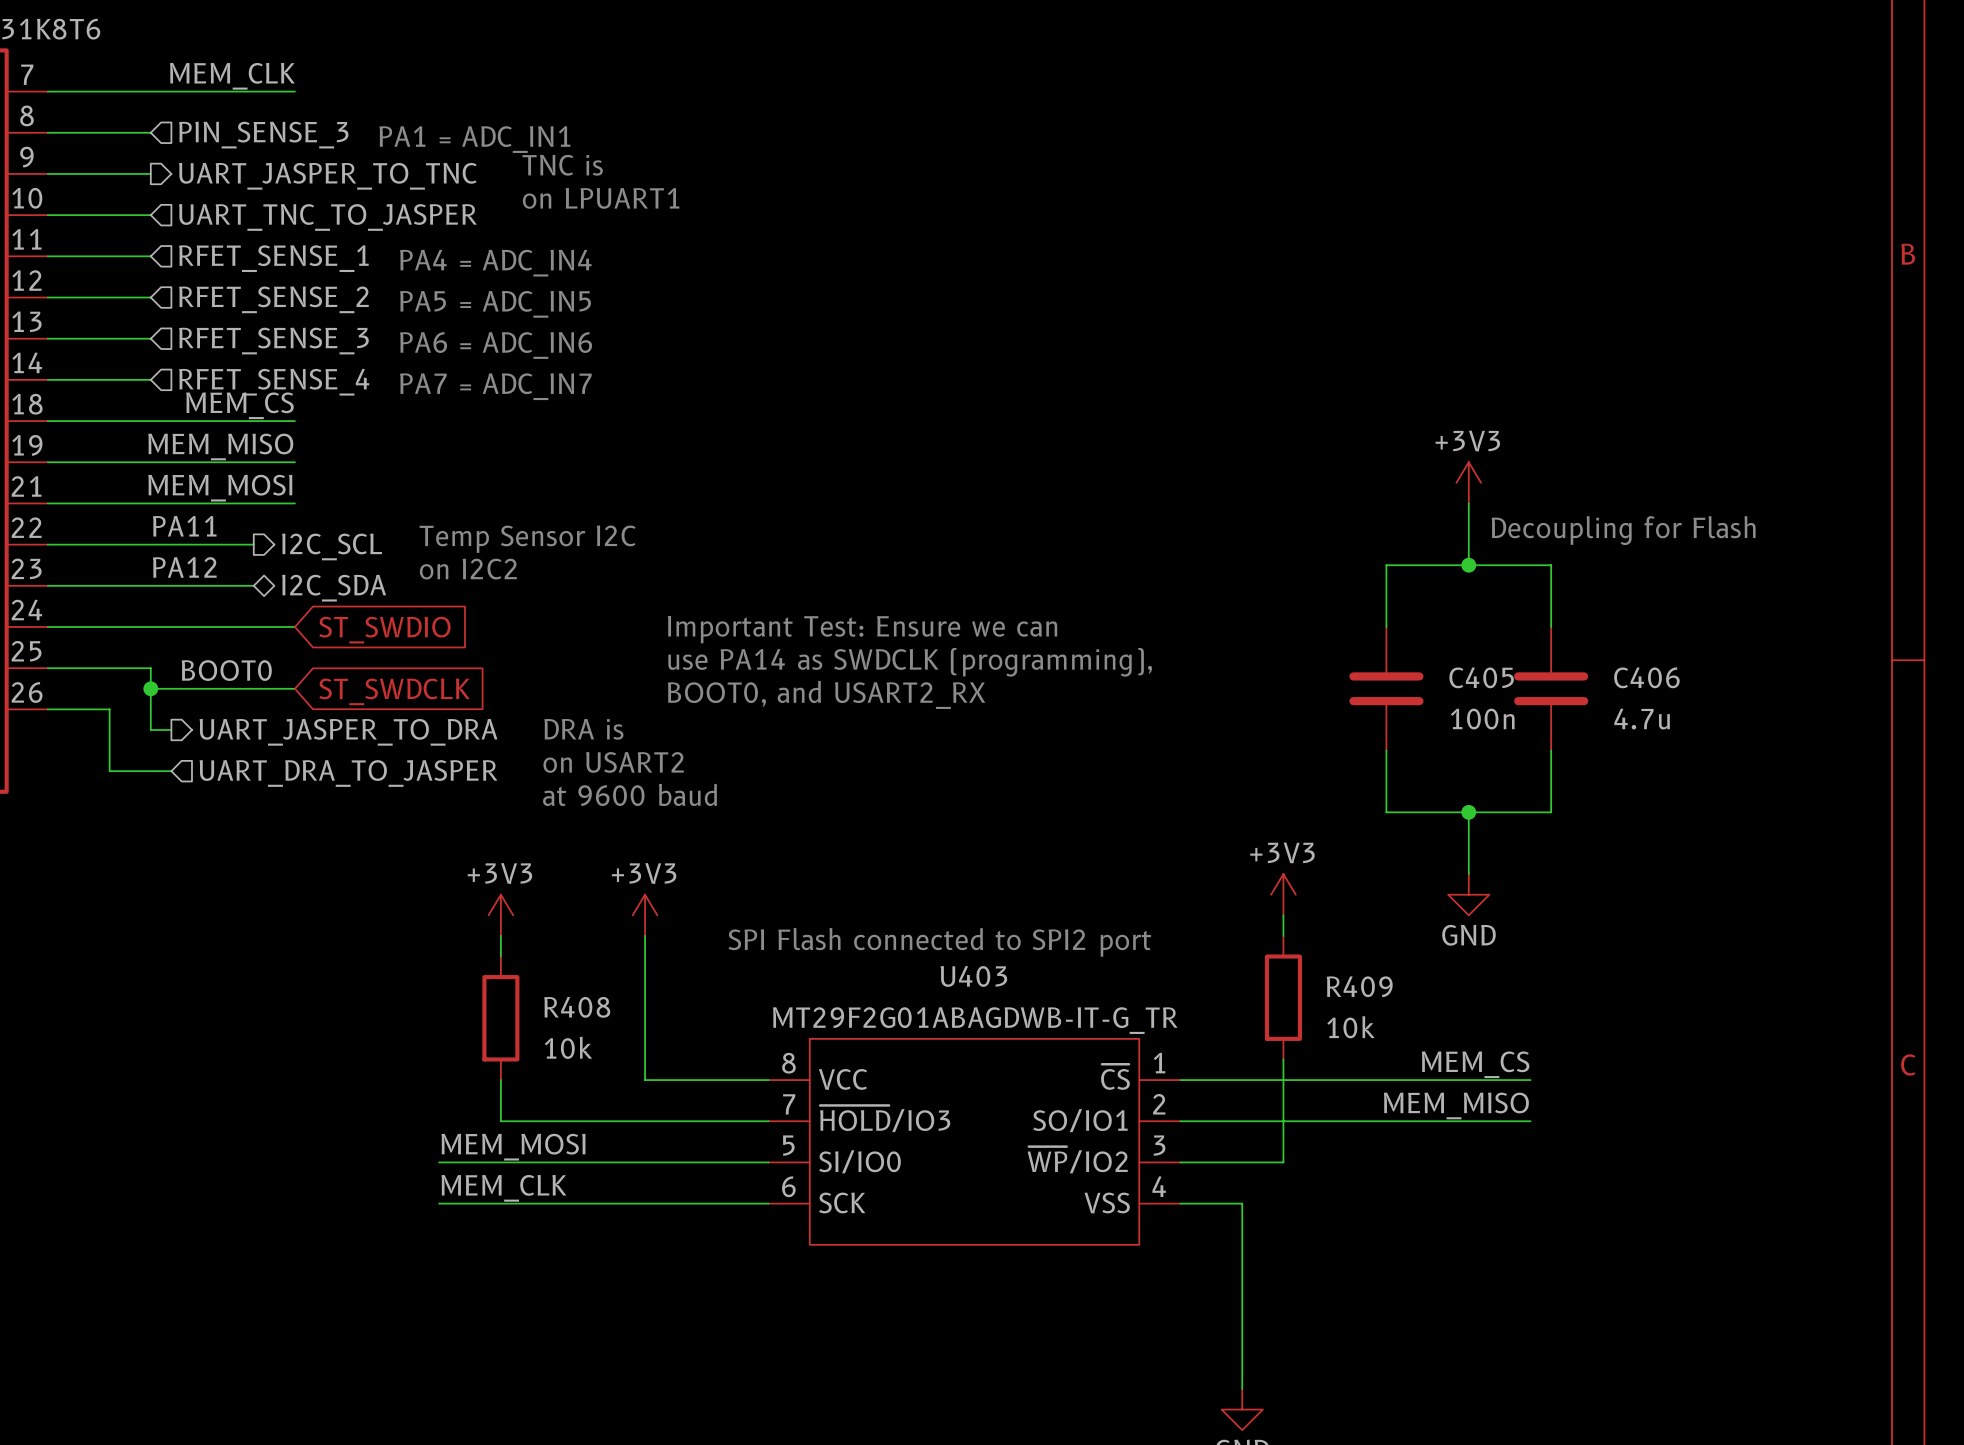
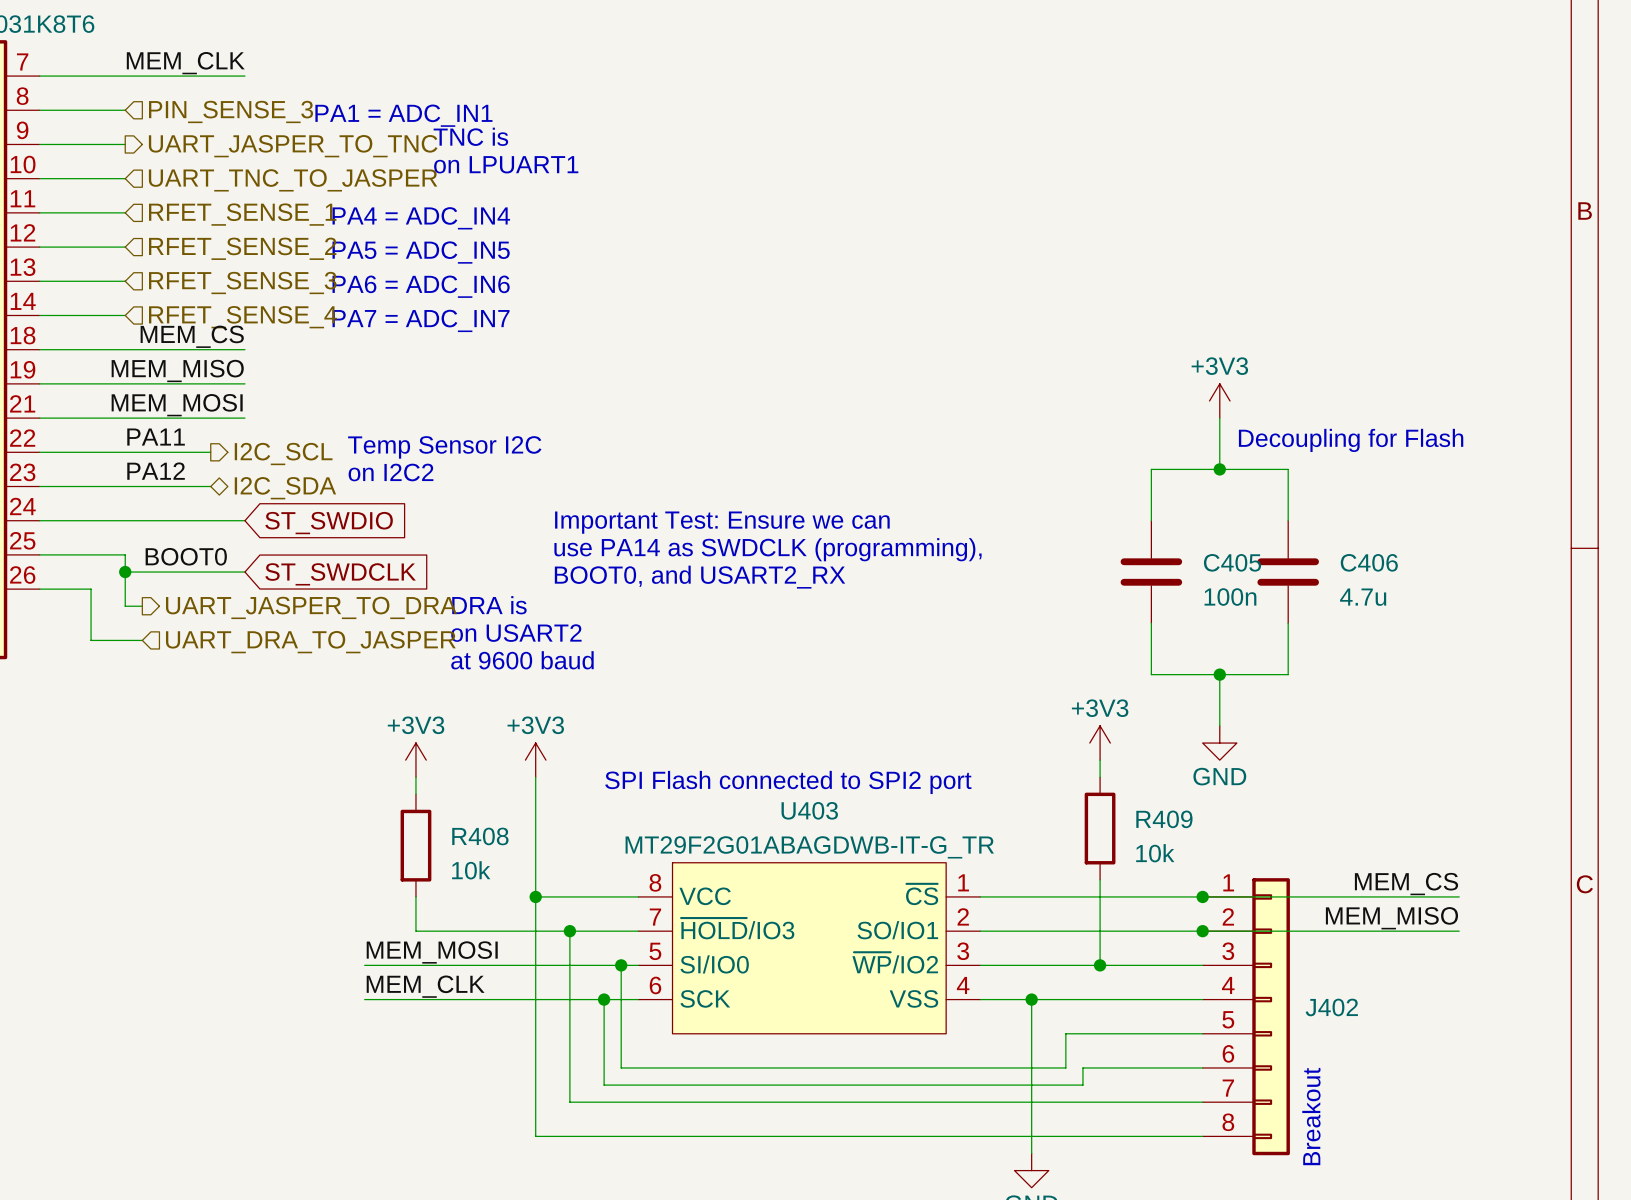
power symbol position: +3V3 (1283, 894) -> +3V3 (1100, 743)
wire: (1283, 915) (1283, 935) -> (1100, 760) (1100, 777)
R409 position: (1283, 997) -> (1100, 828)
wire: (1283, 1059) (1283, 1162) -> (1202, 965) (1065, 965)
wire: none -> (1100, 879) (1100, 965)
label position: MEM_CS (1475, 1064) -> MEM_CS (1406, 884)
wire: none -> (535, 896) (535, 1136) (1202, 1136)
junction: none -> (535, 896)
junction: none -> (1202, 896)
wire: none -> (1271, 896) (1459, 896)
label position: MEM_MISO (1456, 1105) -> MEM_MISO (1391, 918)
wire: none -> (569, 931) (569, 1102) (1202, 1102)
junction: none -> (569, 931)
junction: none -> (1202, 931)
wire: none -> (1271, 931) (1459, 931)
wire: none -> (621, 965) (621, 1067) (1065, 1067) (1065, 1033) (1202, 1033)
junction: none -> (621, 965)
junction: none -> (1100, 965)
wire: none -> (604, 999) (604, 1085) (1082, 1085) (1082, 1067) (1202, 1067)
junction: none -> (604, 999)
wire: none -> (1031, 999) (1202, 999)
junction: none -> (1031, 999)
J402: none -> (1246, 1016)
text: none -> Breakout (1311, 1116)

